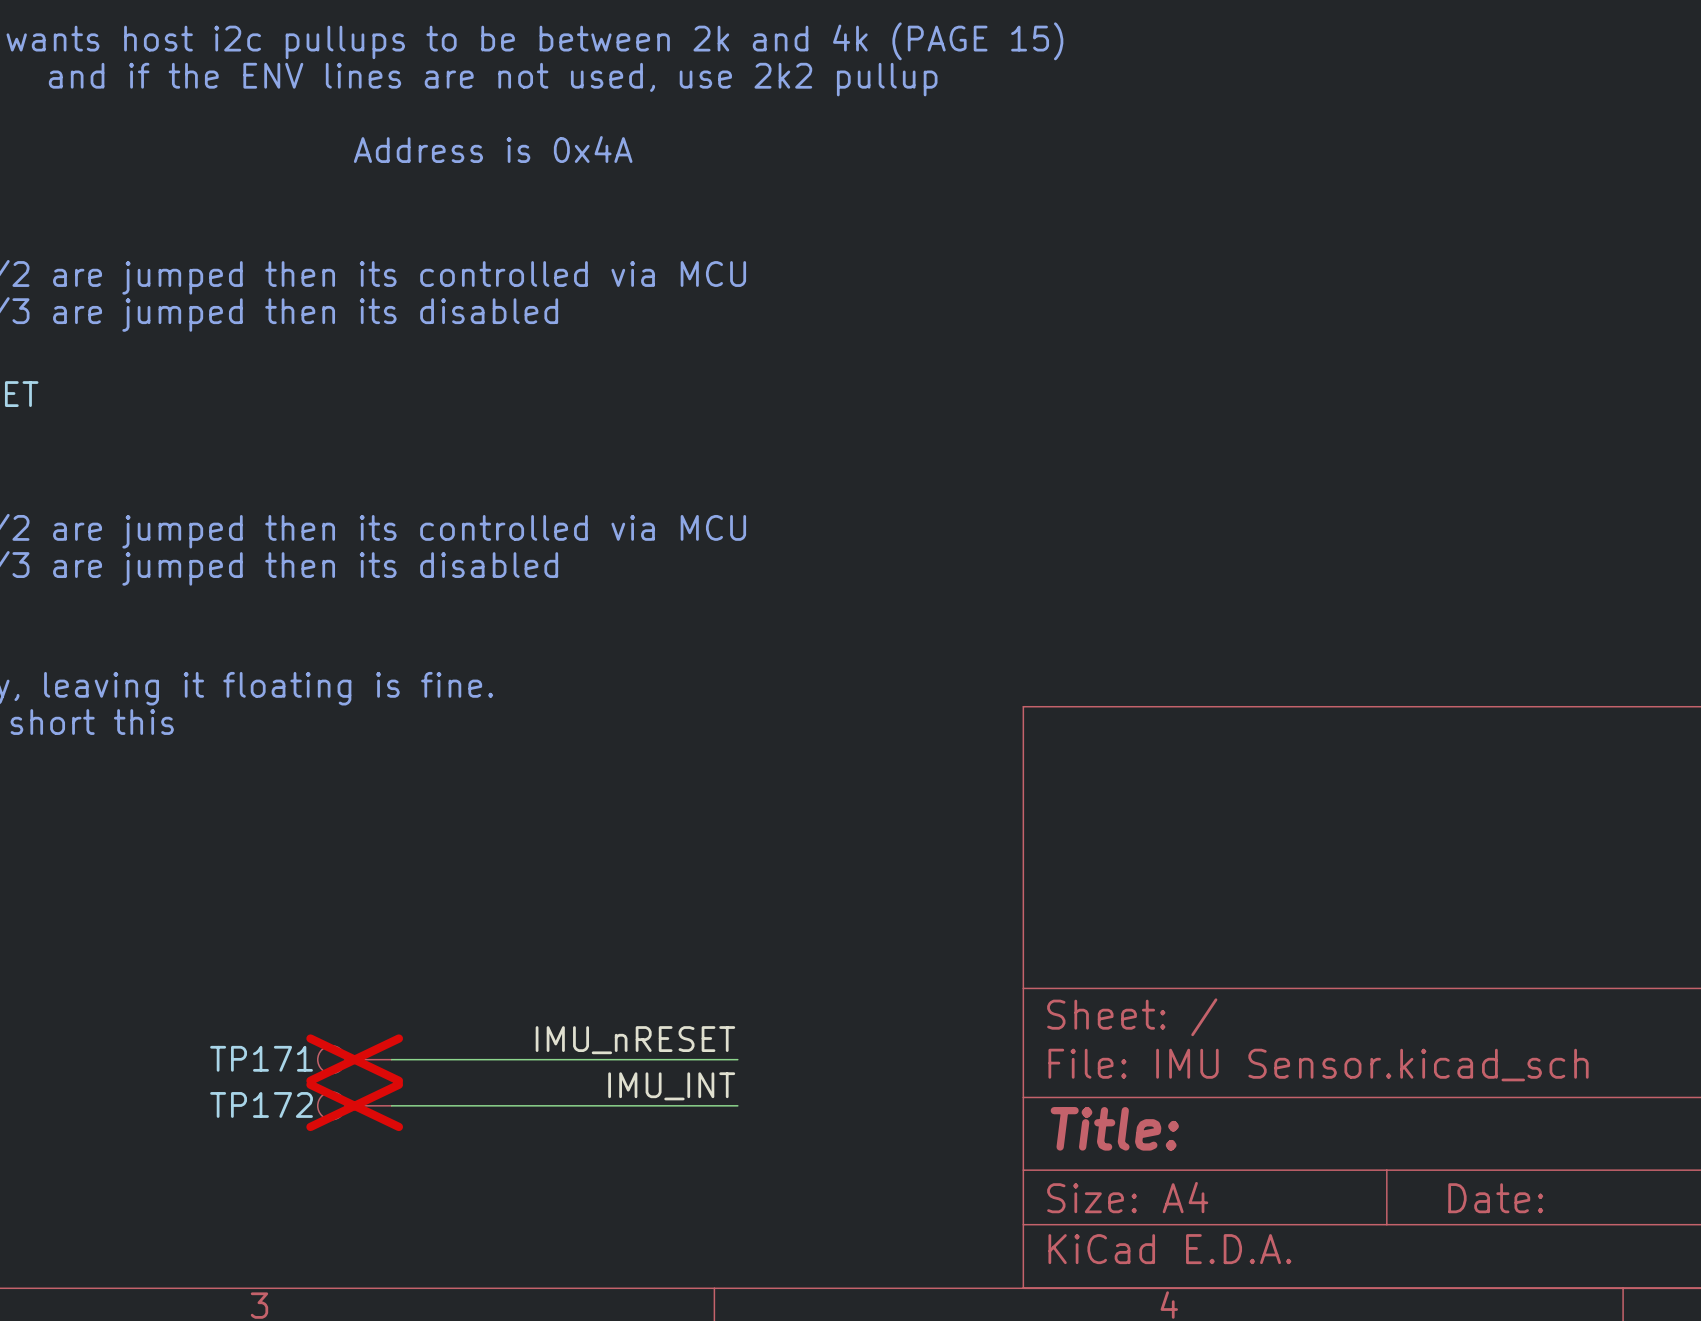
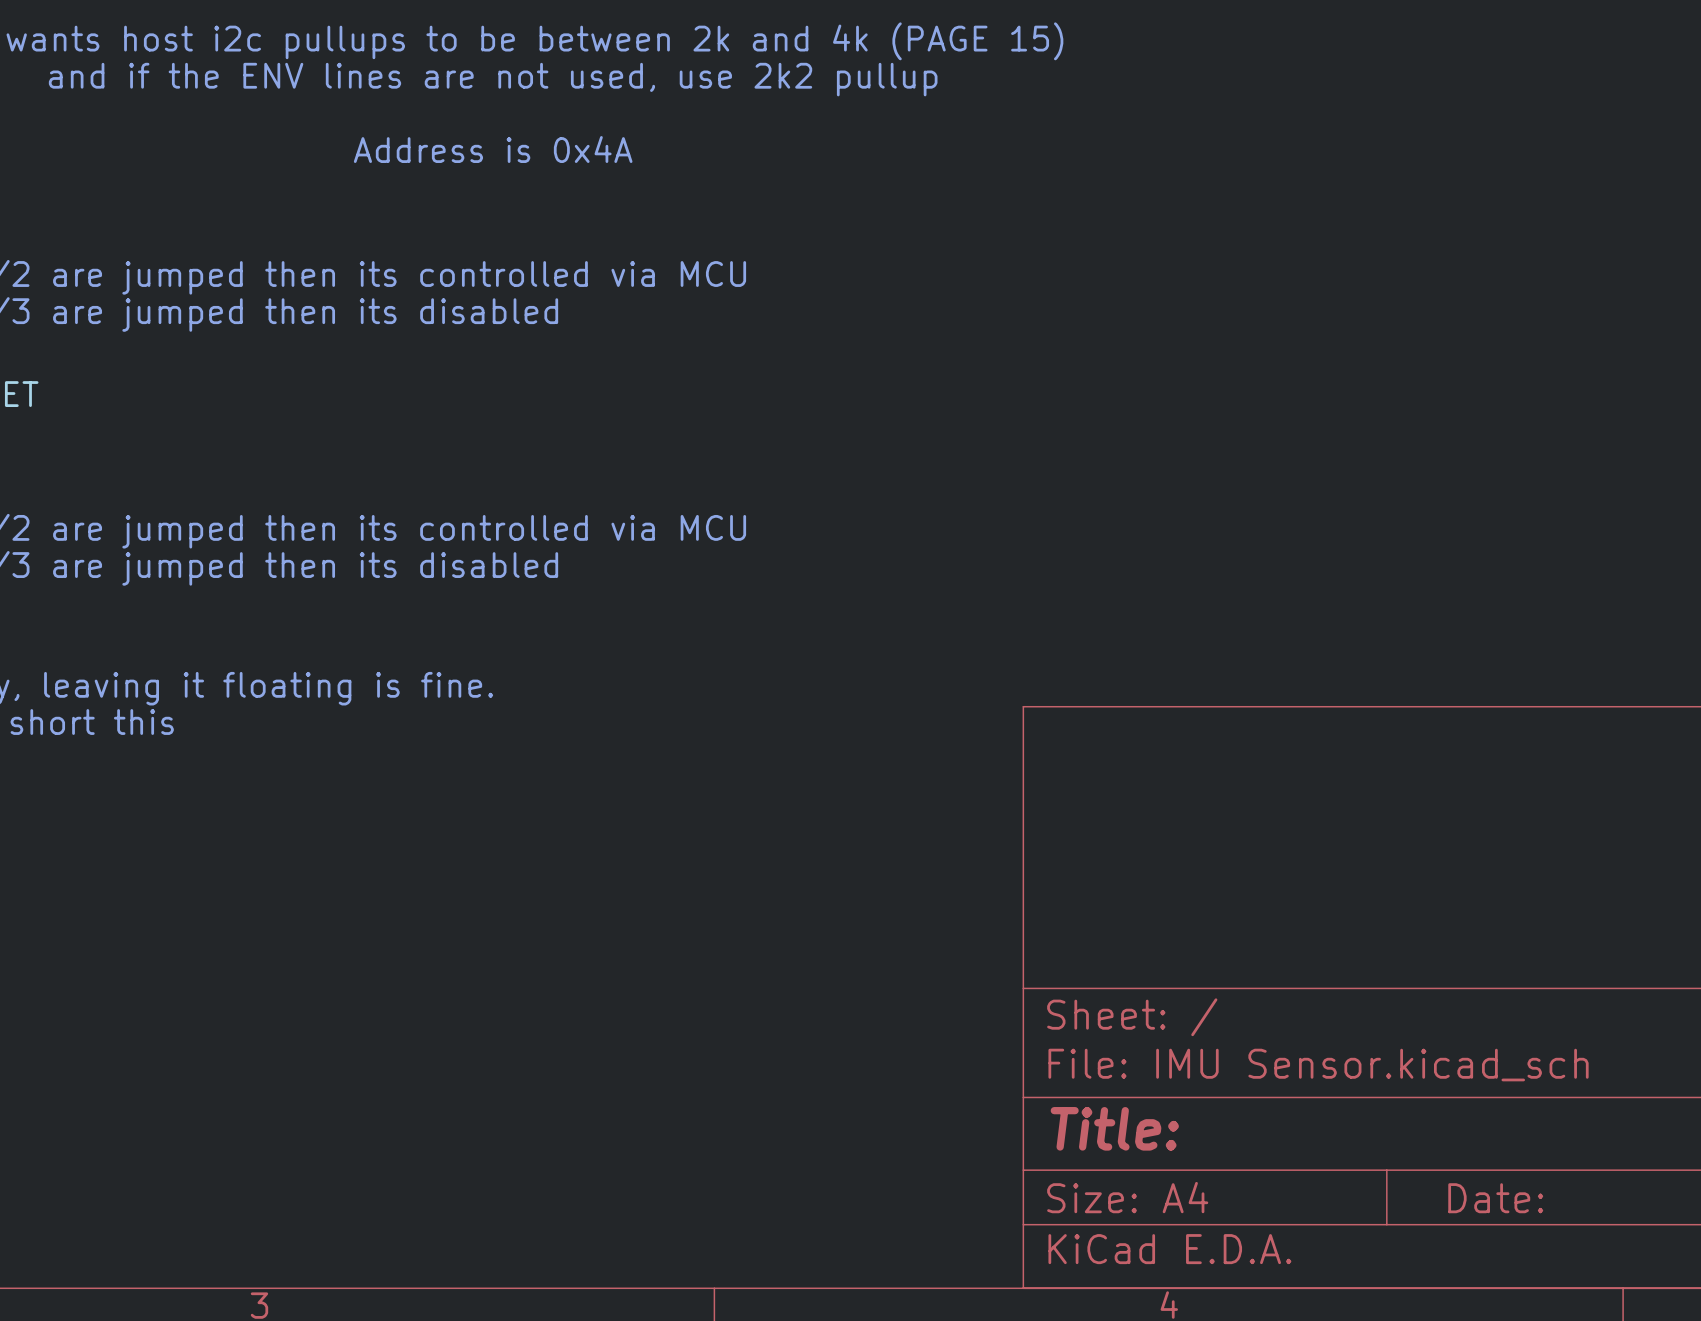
label: IMU_nRESET (635, 1040) -> none
TP171: (354, 1059) -> none
wire: (391, 1059) (737, 1059) -> none
label: IMU_INT (671, 1086) -> none
TP172: (354, 1105) -> none
wire: (391, 1105) (737, 1105) -> none

